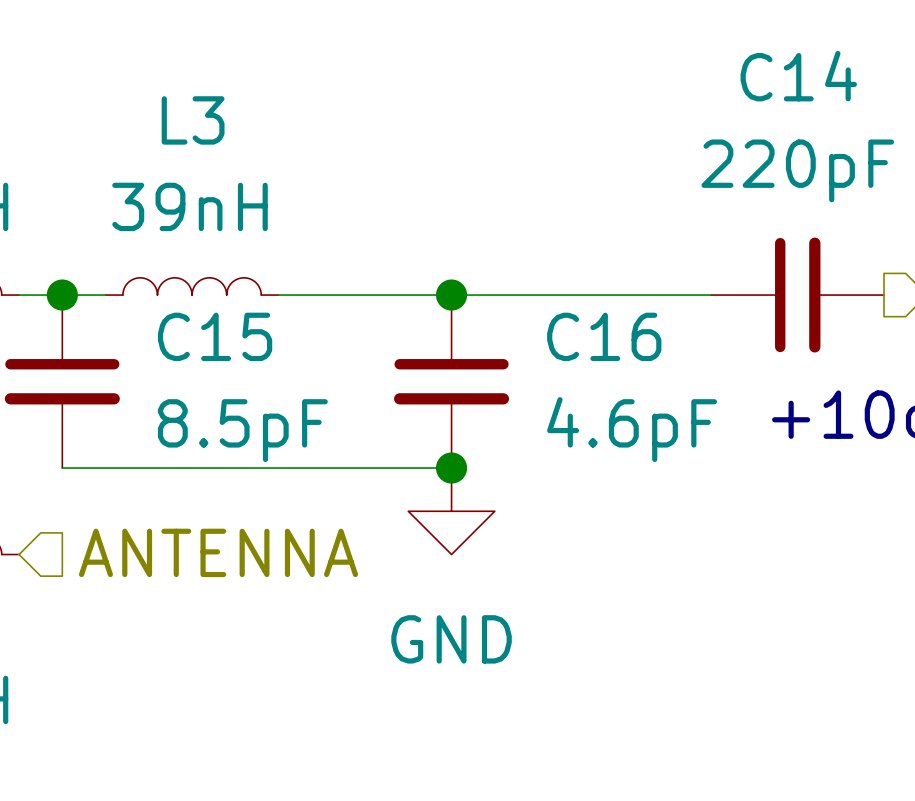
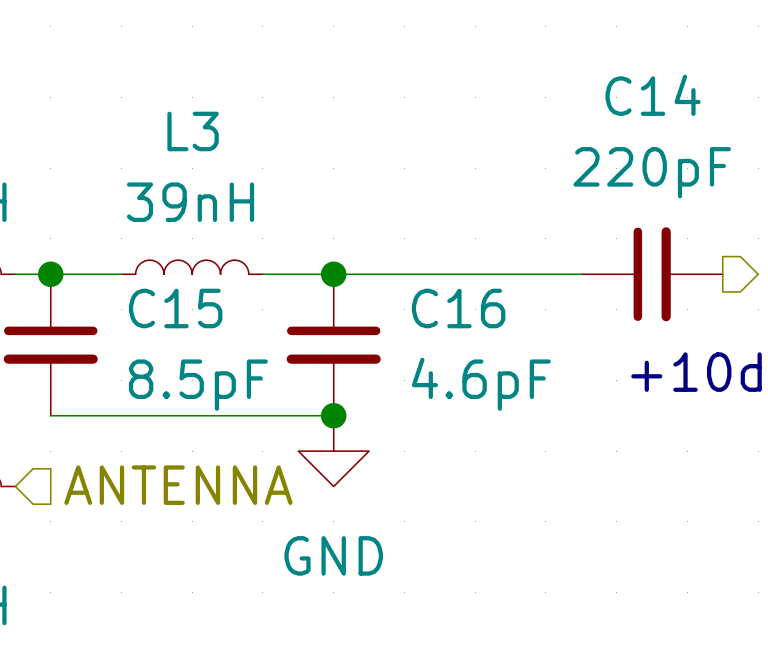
L3 position: (192, 286) -> (192, 267)
wire: (278, 295) (321, 295) -> (86, 274) (121, 274)
junction position: (451, 295) -> (333, 274)
C16 position: (451, 381) -> (333, 345)
wire: (408, 468) (451, 468) -> none
junction position: (451, 468) -> (333, 415)
power symbol position: GND (451, 511) -> GND (333, 451)

